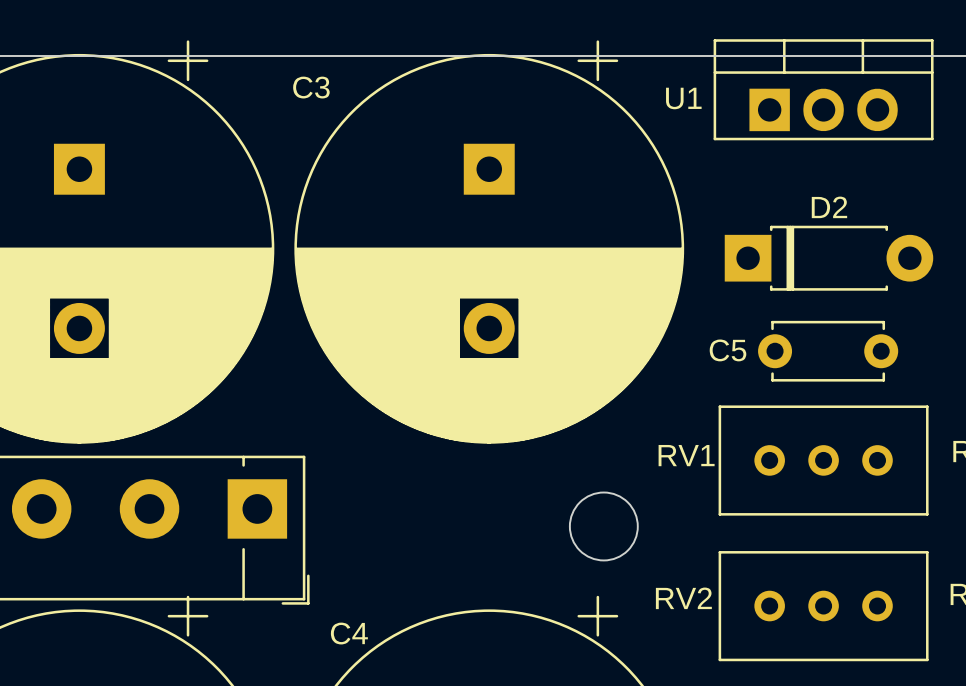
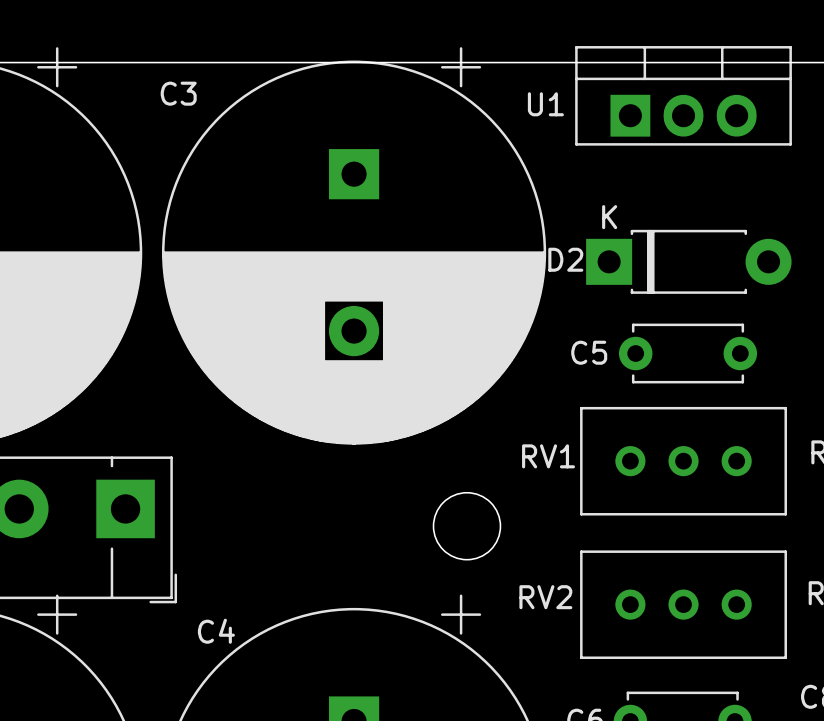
D2 name position: D2 (829, 207) -> D2 (565, 259)
D2 text: none -> K (609, 217)

